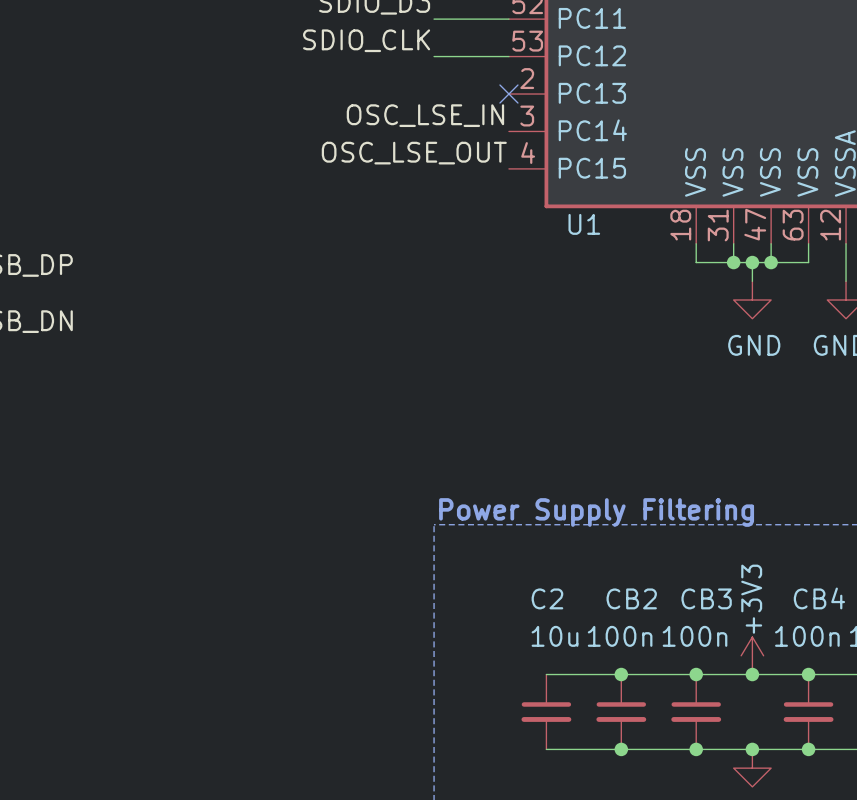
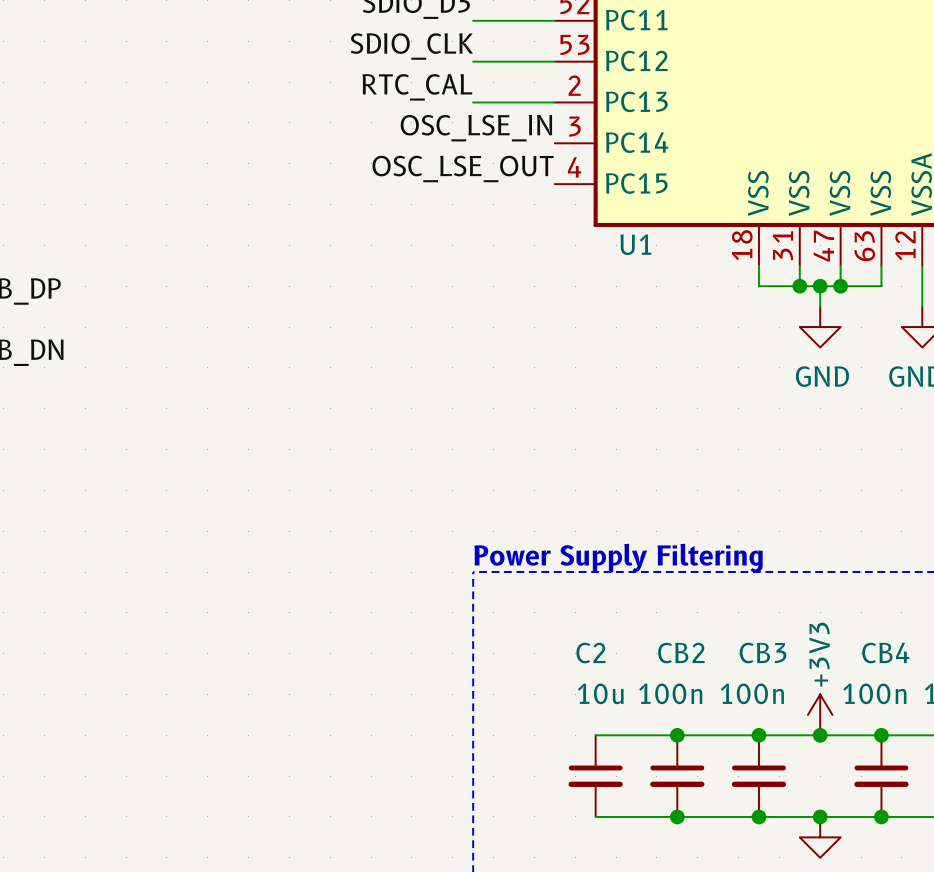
label: none -> RTC_CAL (417, 87)
wire: none -> (473, 102) (554, 102)
no-connect mark: (508, 94) -> none

